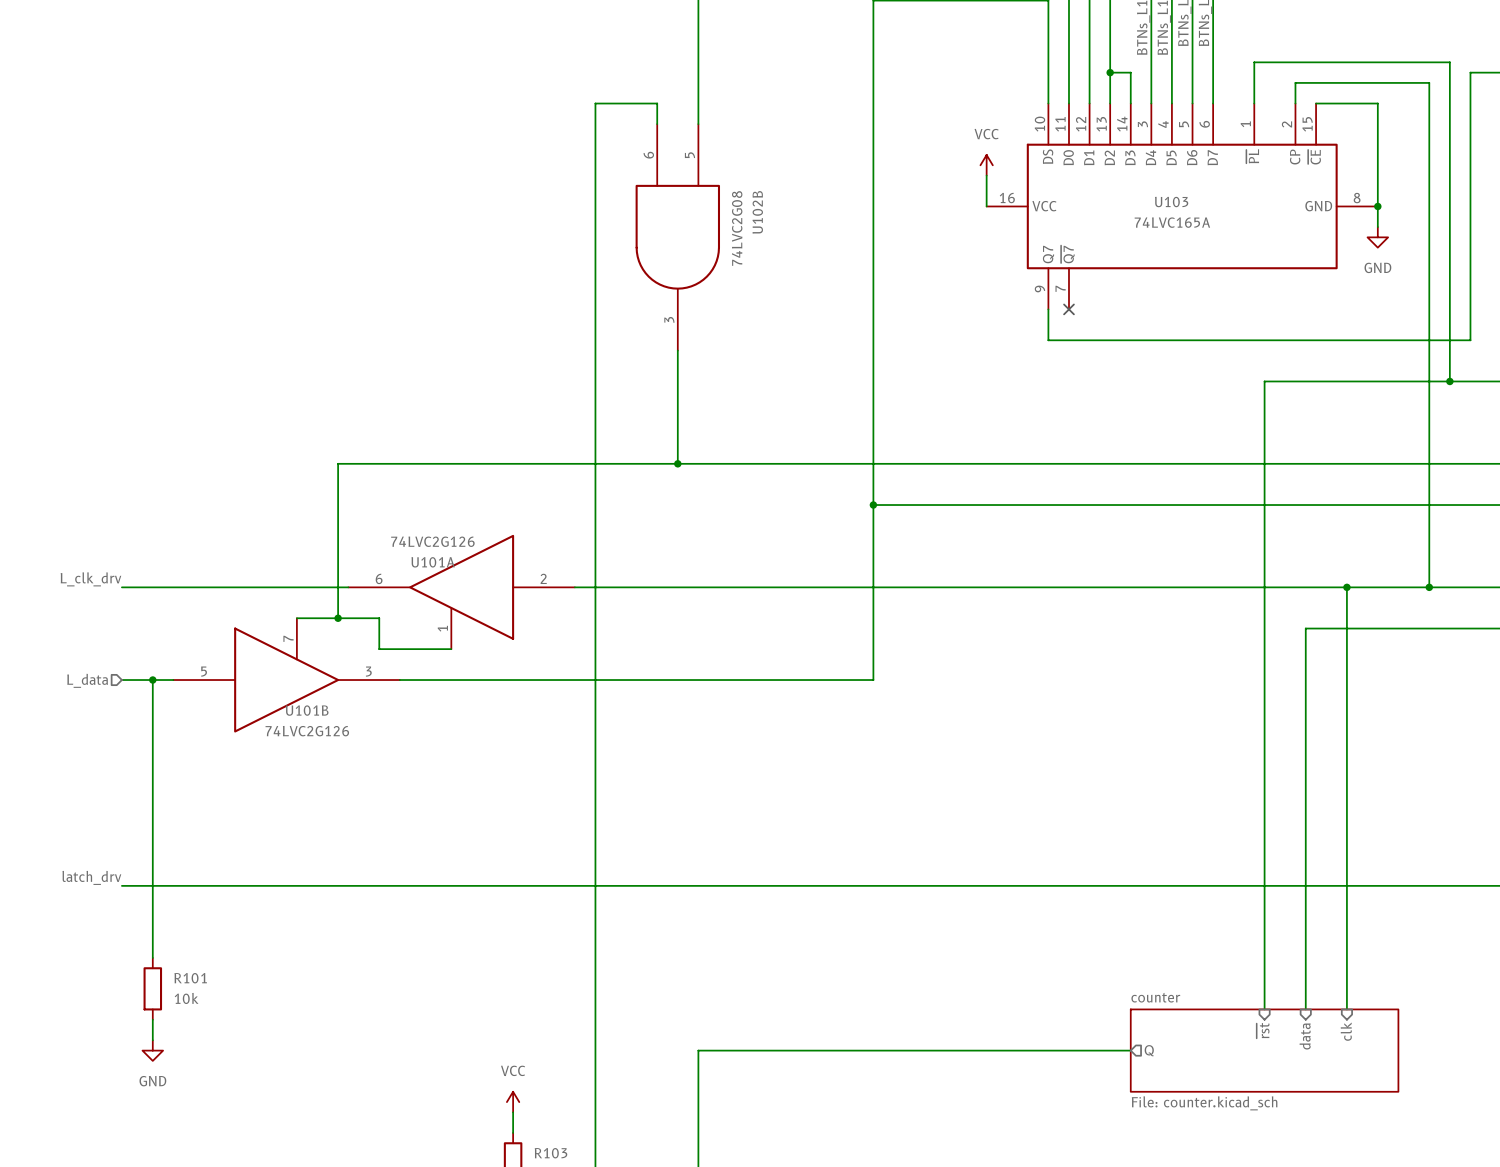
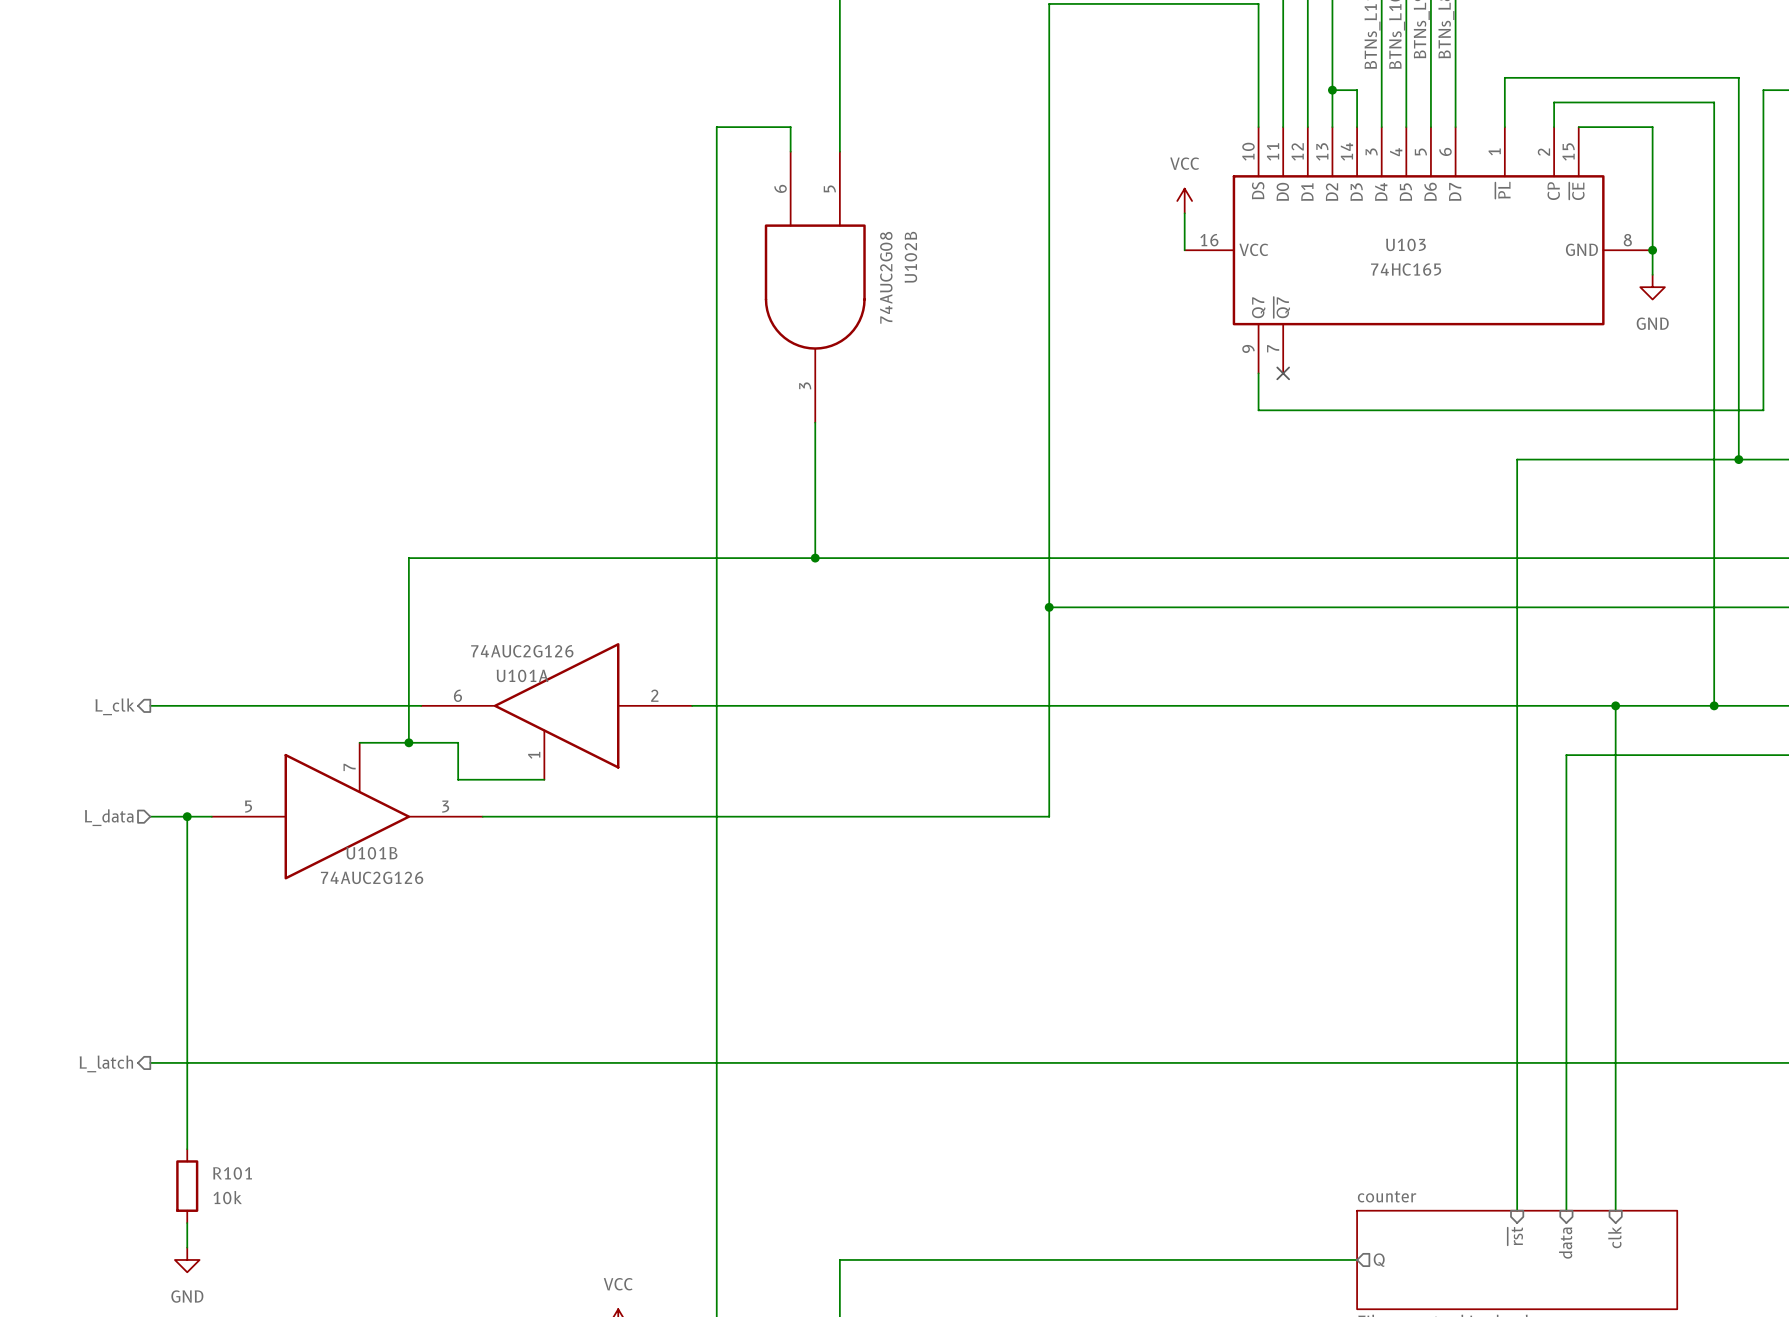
U103 value: 74LVC165A (1172, 222) -> 74HC165 (1406, 269)
U102B value: 74LVC2G08 (737, 228) -> 74AUC2G08 (886, 277)
U101A value: 74LVC2G126 (432, 541) -> 74AUC2G126 (522, 651)
label: L_clk_drv (90, 579) -> none
hierarchical label: none -> L_clk (115, 706)
U101B value: 74LVC2G126 (307, 731) -> 74AUC2G126 (372, 877)
label: latch_drv (91, 877) -> none
hierarchical label: none -> L_latch (106, 1063)

